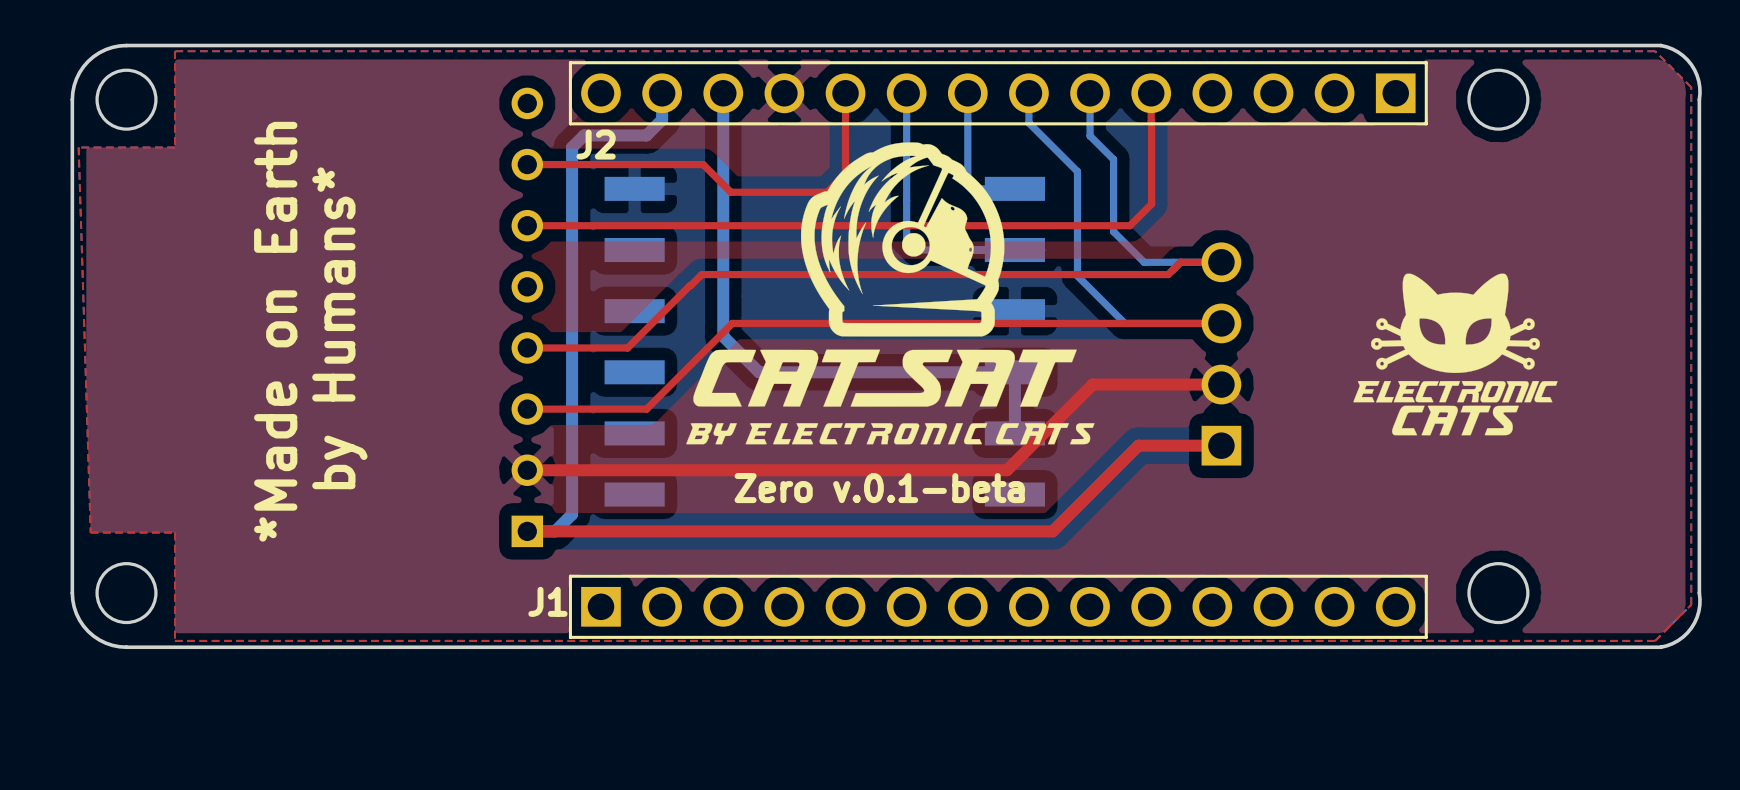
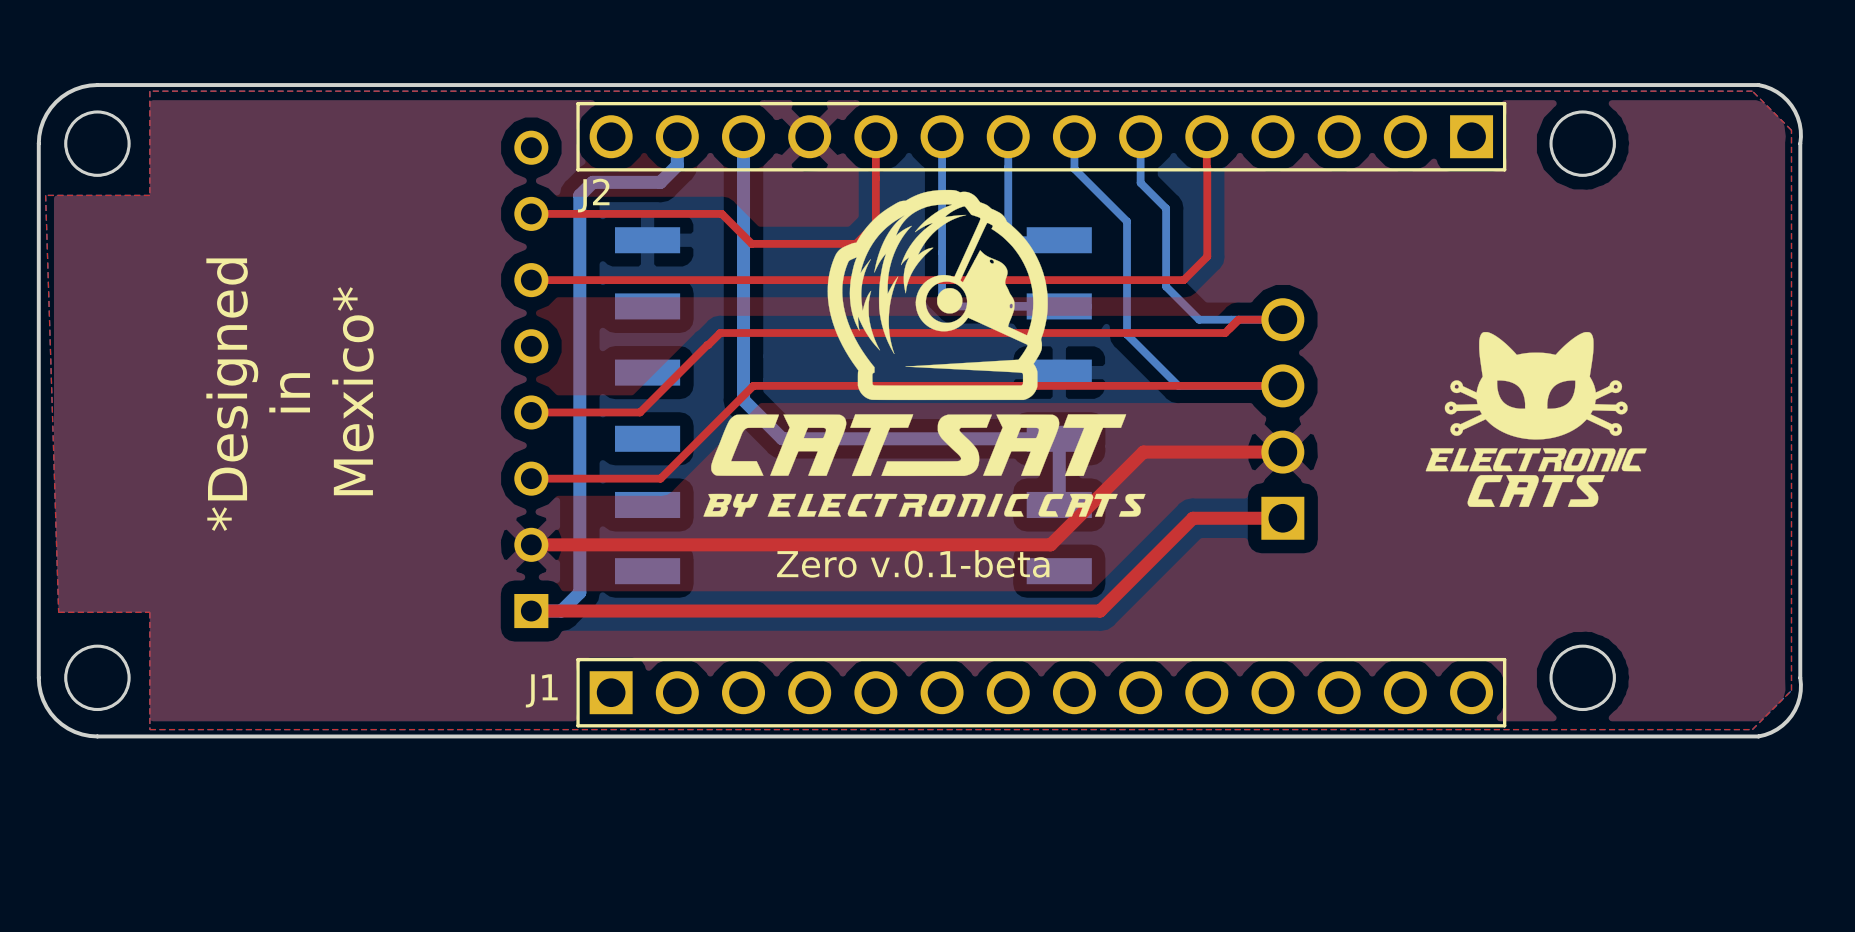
text: by Humans* (339, 328) -> none
text: none -> Mexico* (352, 391)
text: none -> in (289, 392)
text: none -> *Designed (232, 394)
text: *Made on Earth (275, 331) -> none

